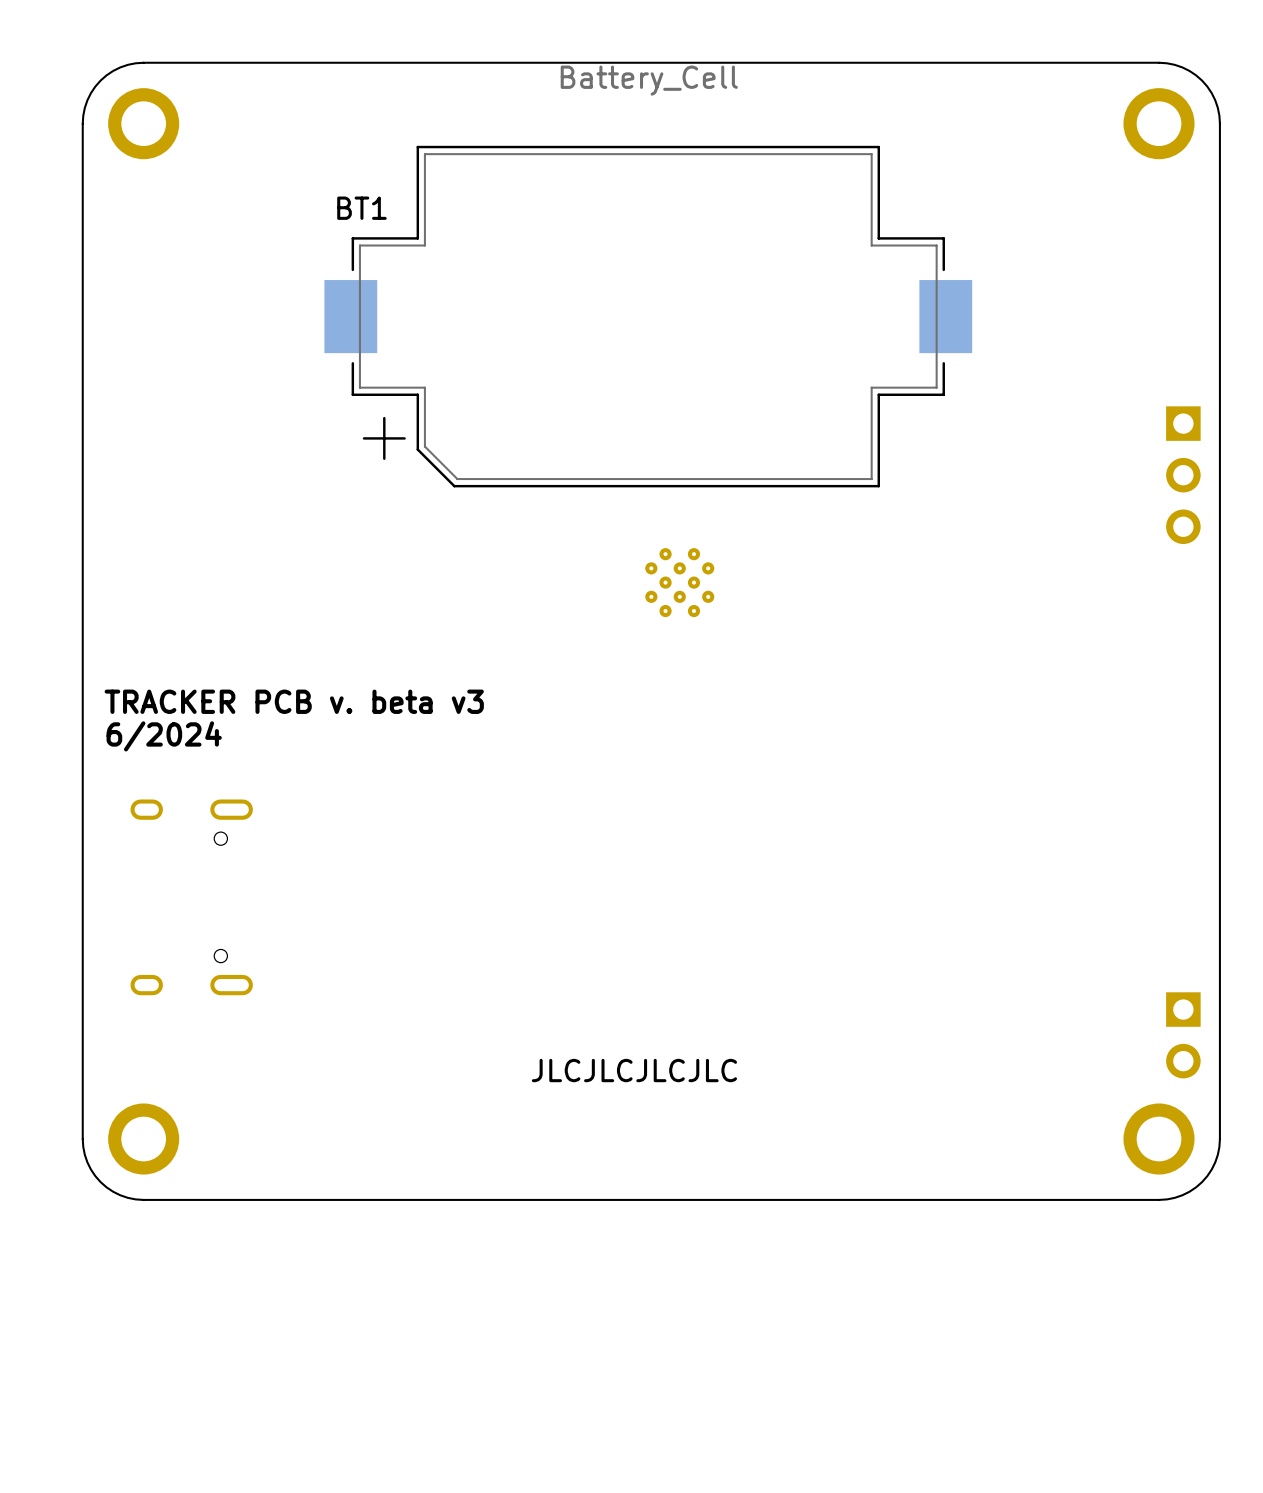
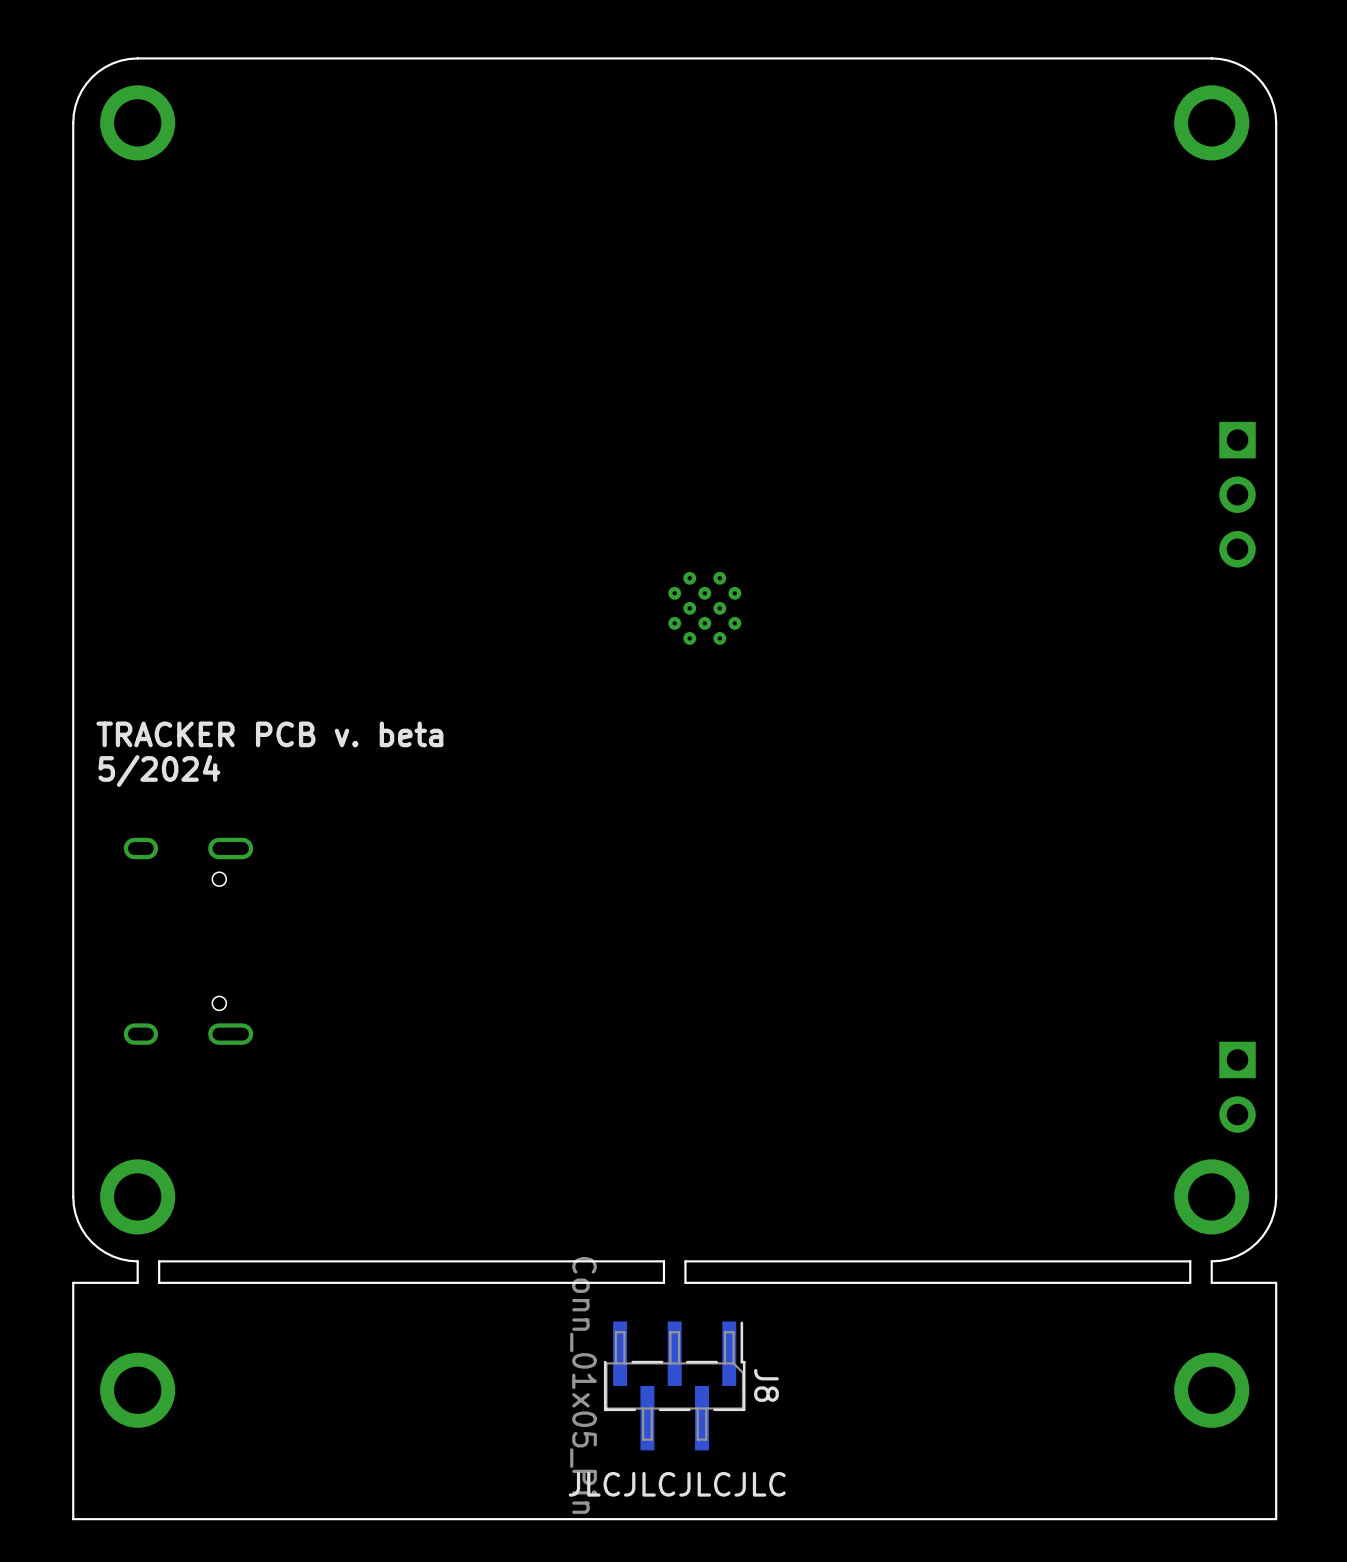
BT1: Battery_Cell (648, 316) -> none
text: TRACKER PCB v. beta v3 (294, 701) -> TRACKER PCB v. beta (269, 734)
text: 6/2024 (164, 736) -> 5/2024 (159, 771)
text position: JLCJLCJLCJLC (634, 1070) -> JLCJLCJLCJLC (677, 1484)
board edge: (163, 1199) (143, 1199) -> (1211, 1261) (1211, 1282) (1276, 1282) (1276, 1519) (73, 1519) (73, 1282) (137, 1282) (137, 1261)
board edge: (661, 1199) (641, 1199) -> (159, 1261) (159, 1282) (663, 1282) (663, 1261)
board edge: (1159, 1199) (1138, 1199) -> (685, 1261) (685, 1282) (1190, 1282) (1190, 1261)
J8: none -> Conn_01x05_Pin (674, 1385)
part: none -> (137, 1390)
part: none -> (1211, 1390)

